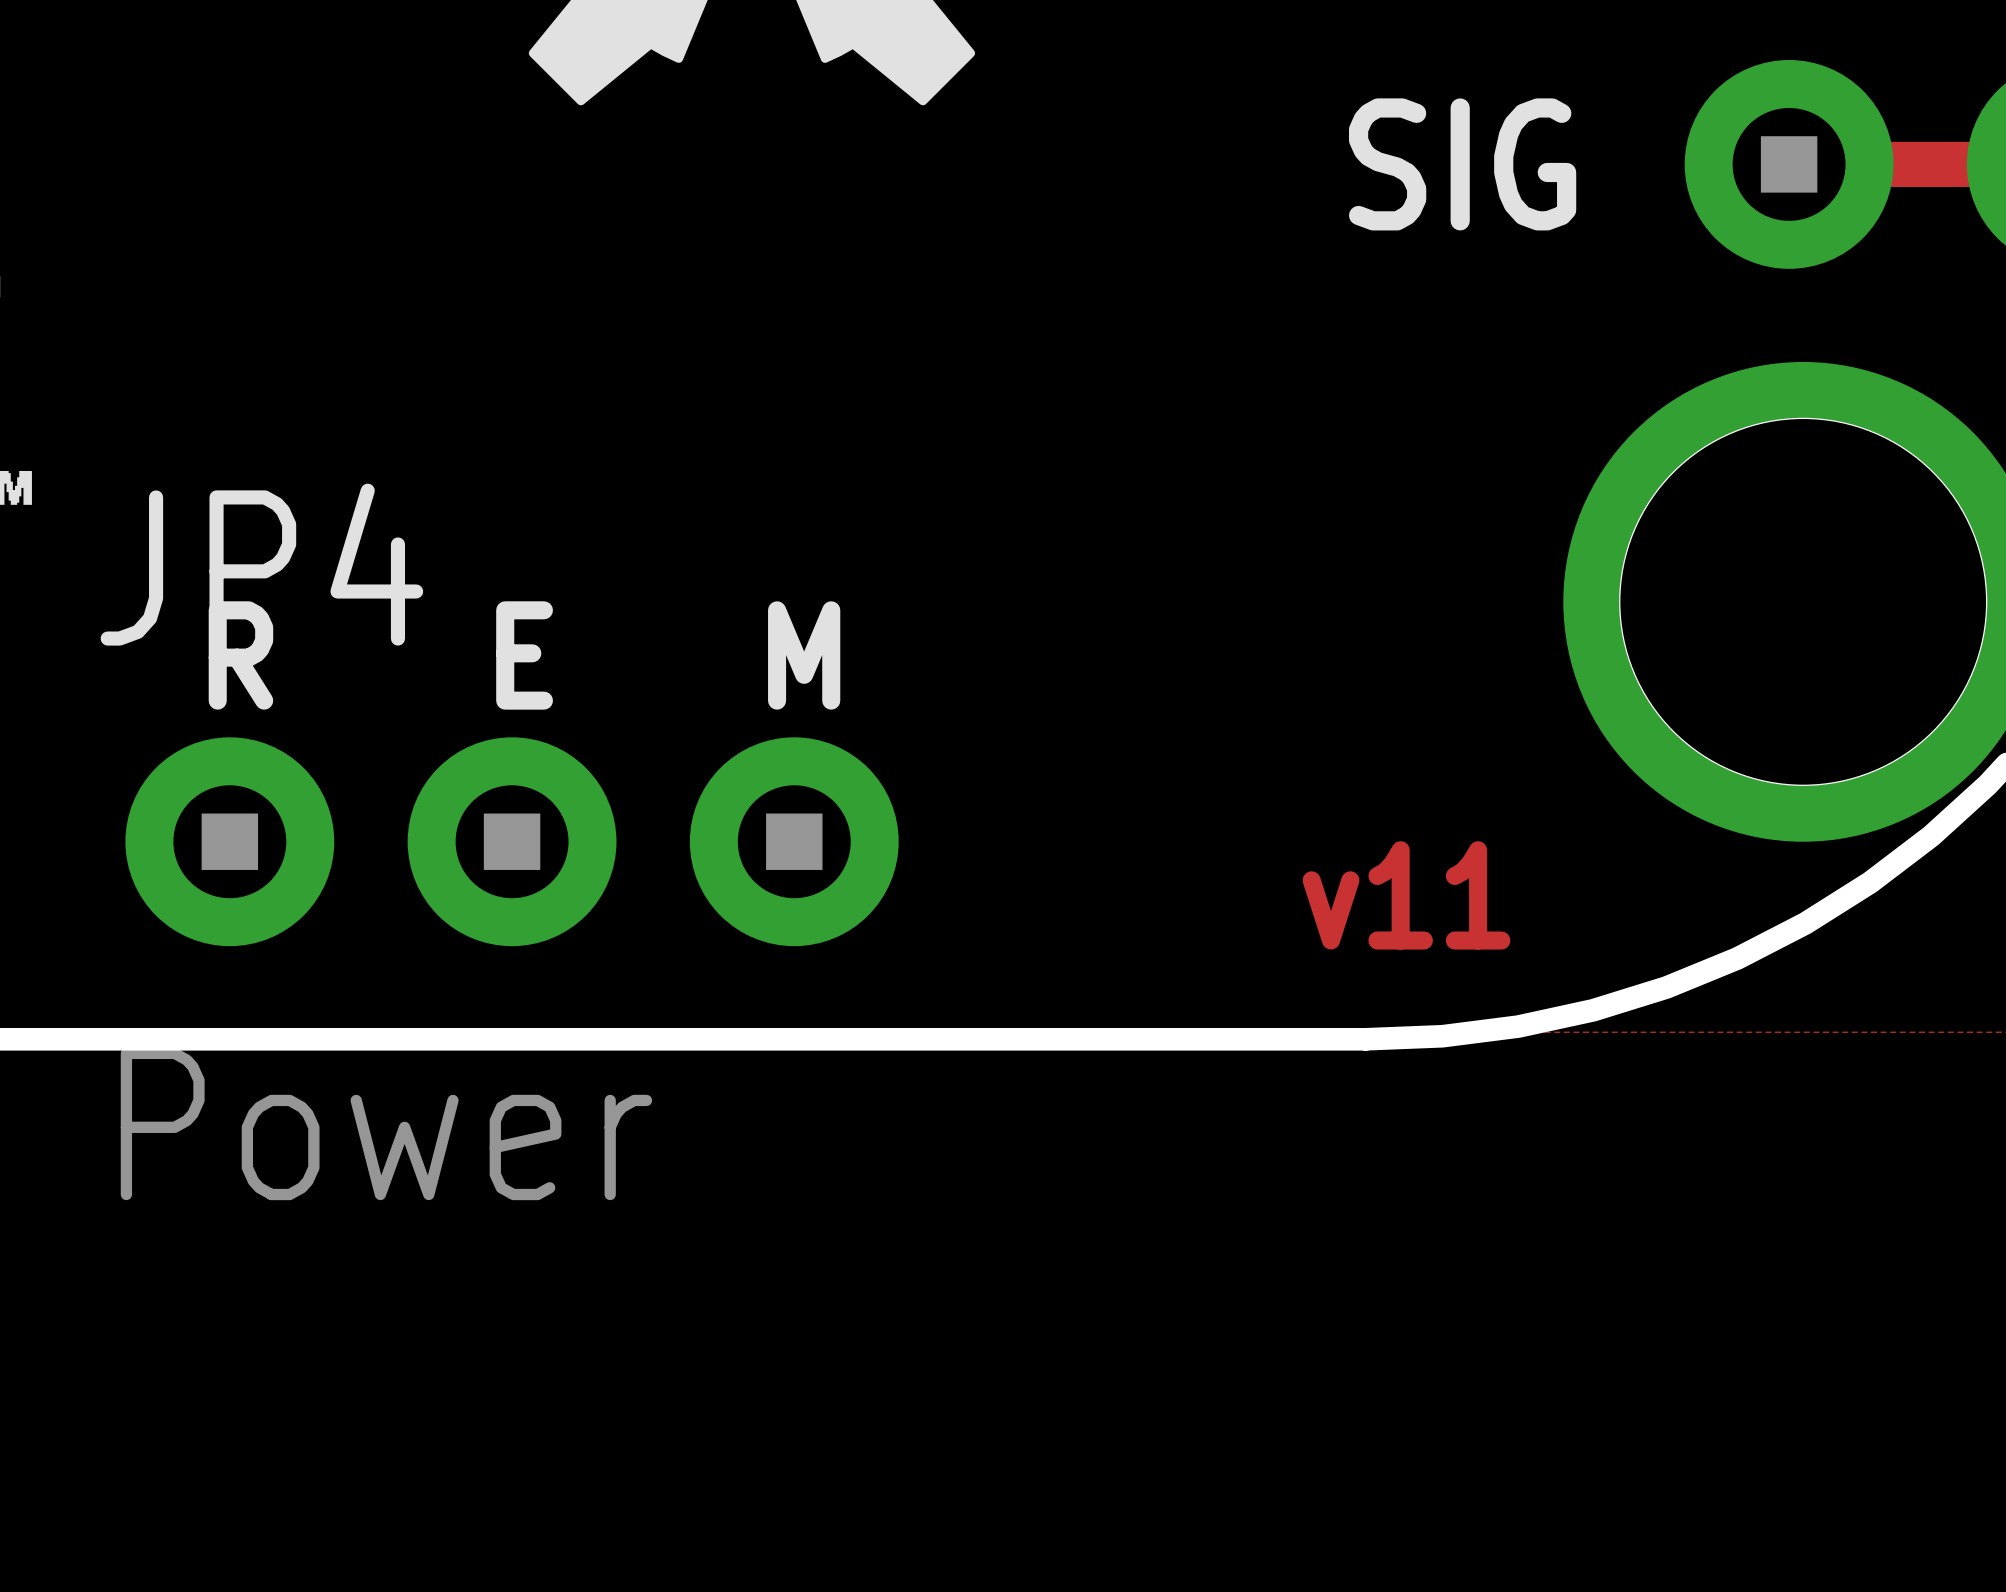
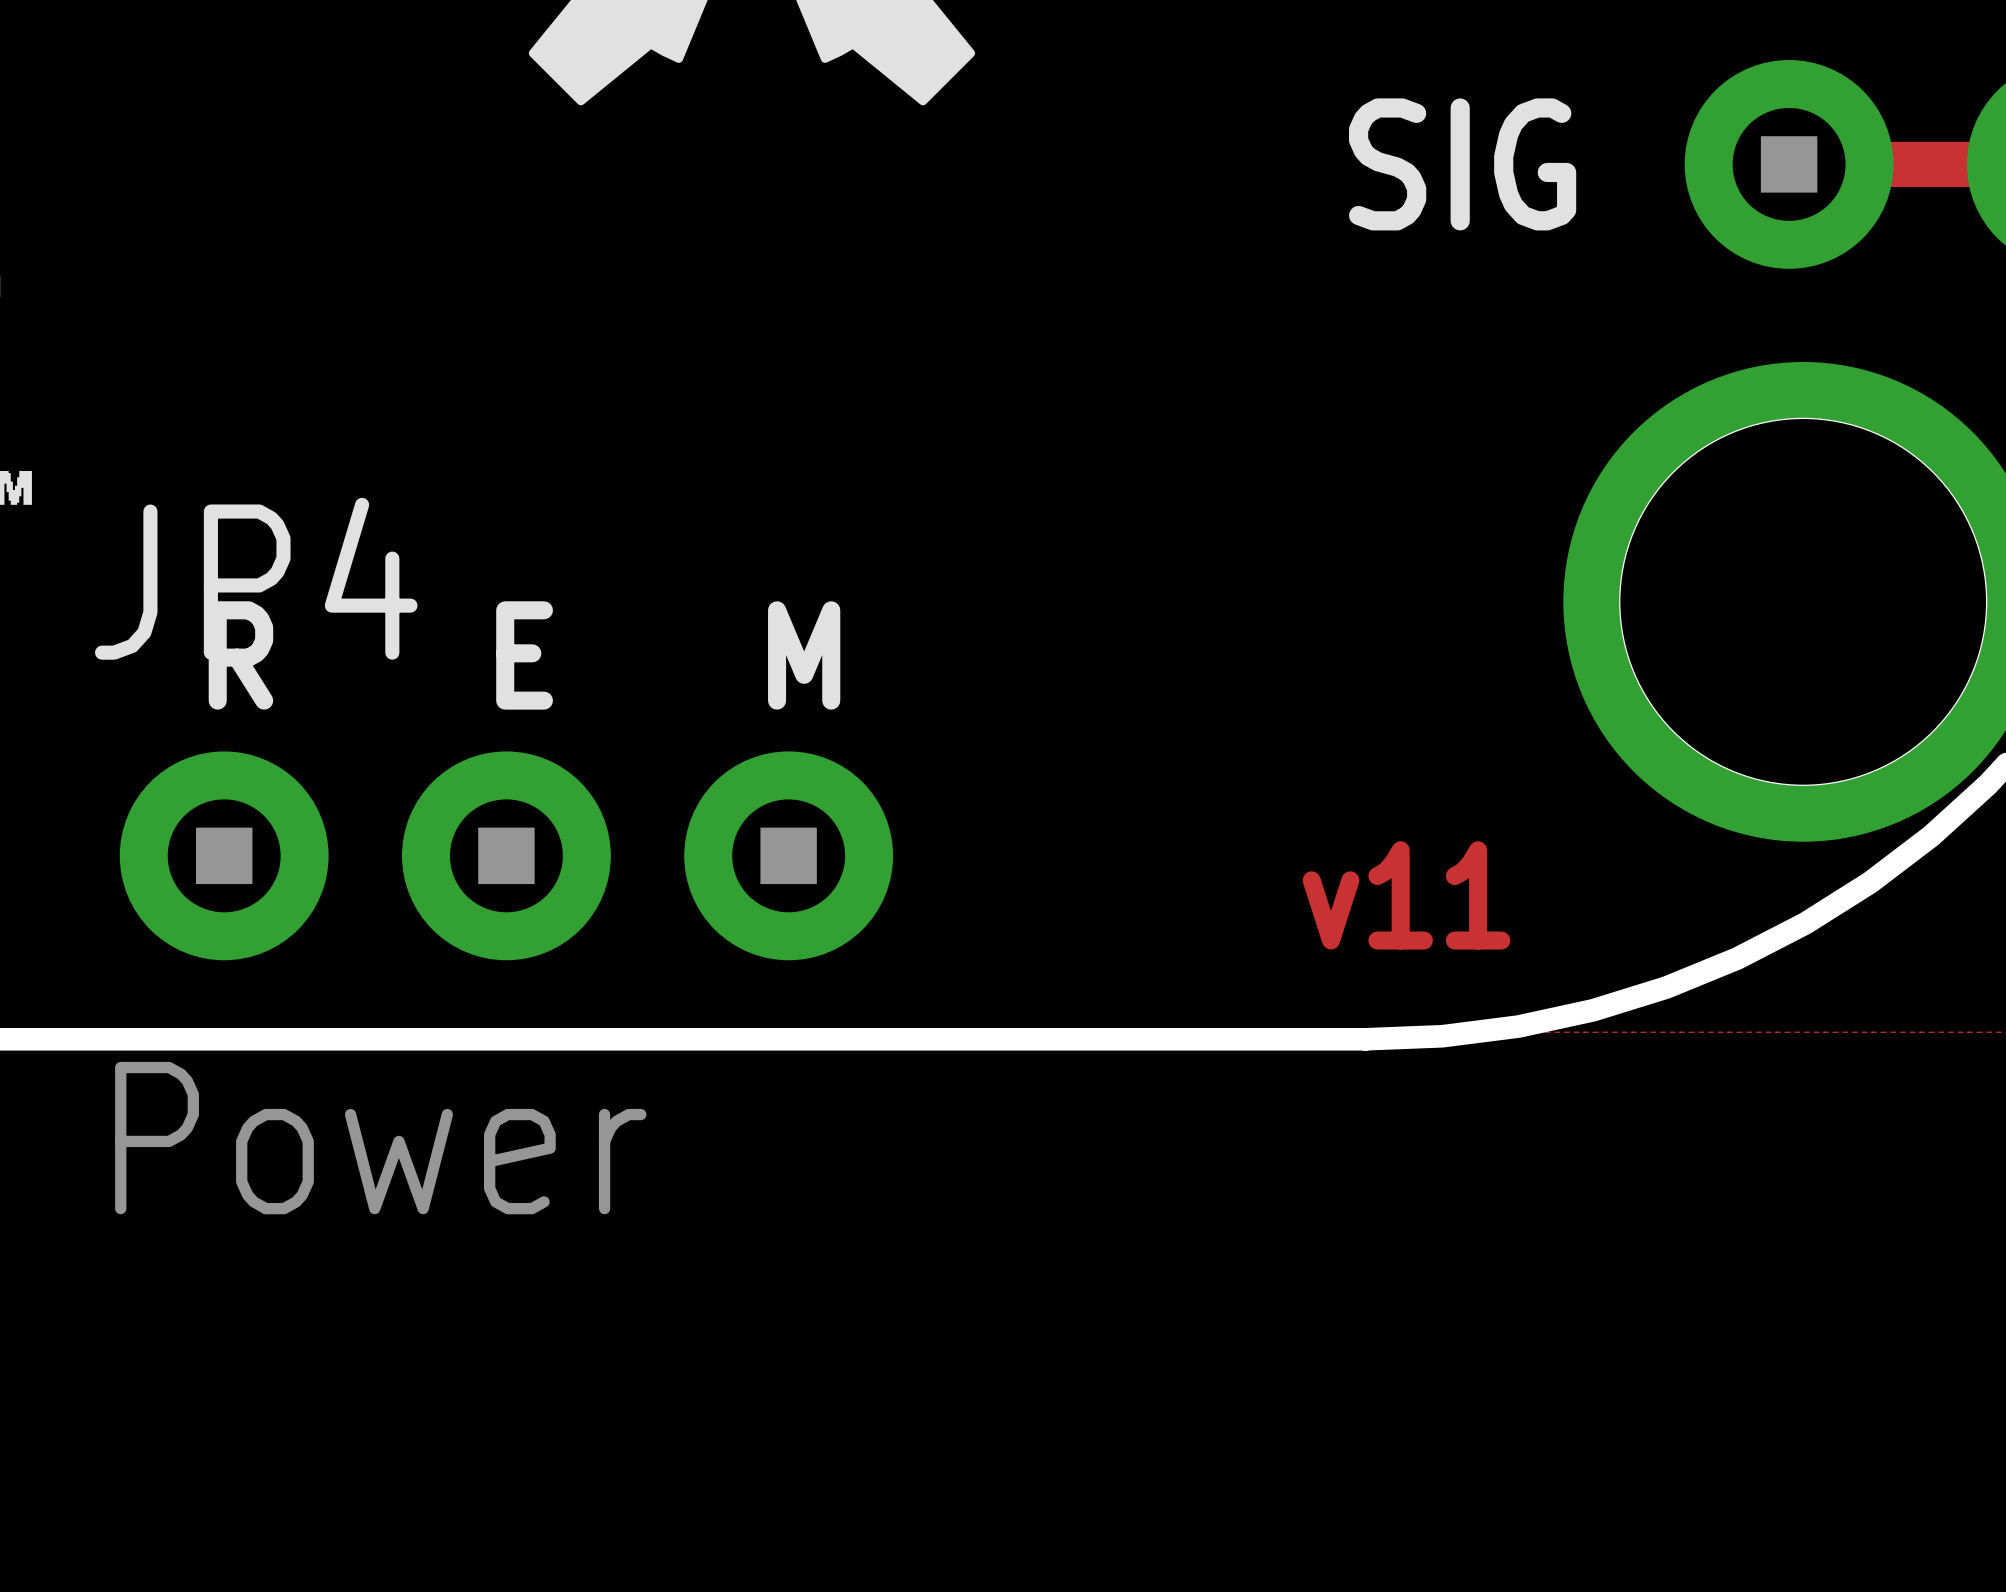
JP4 position: (512, 841) -> (506, 855)

